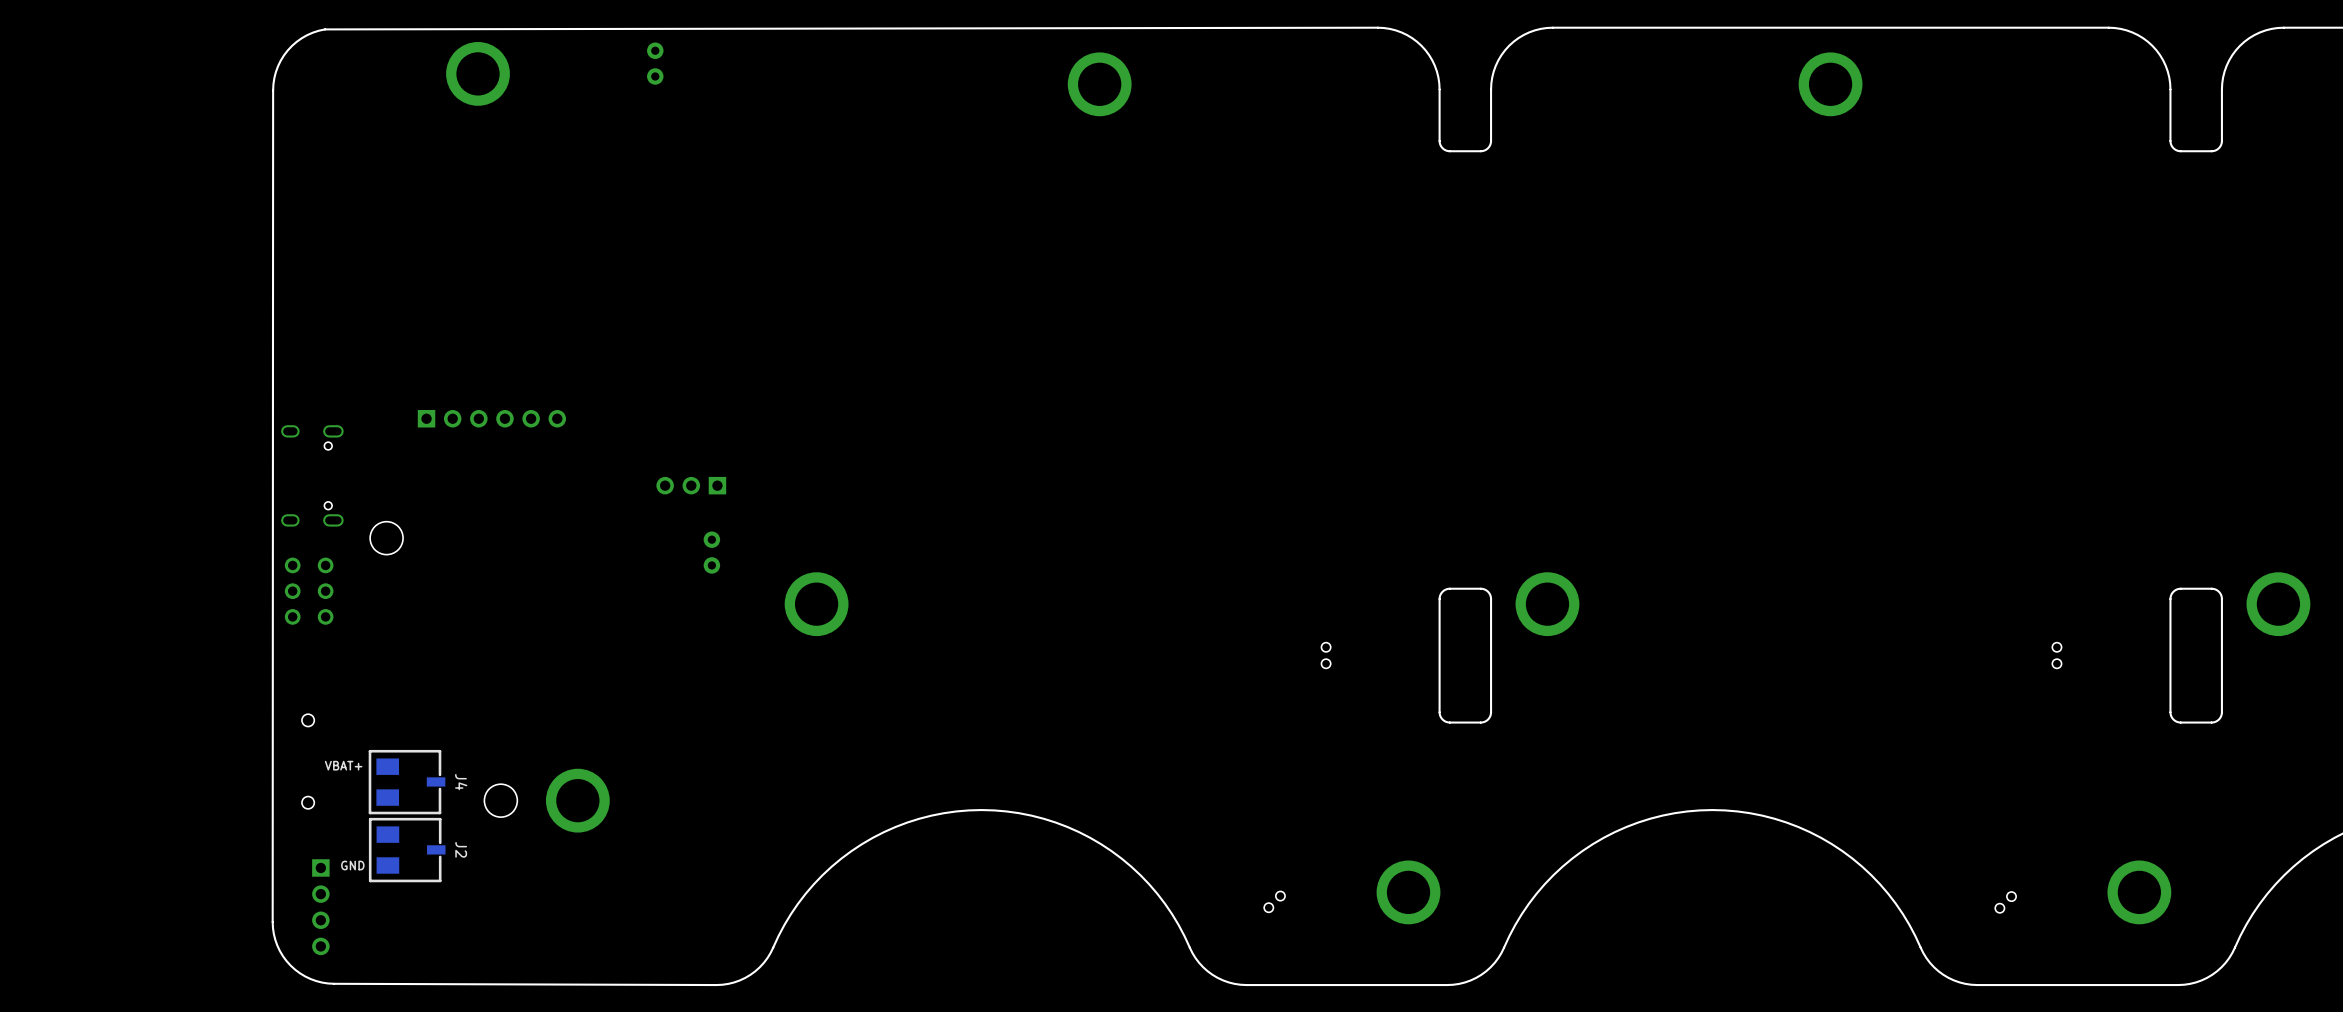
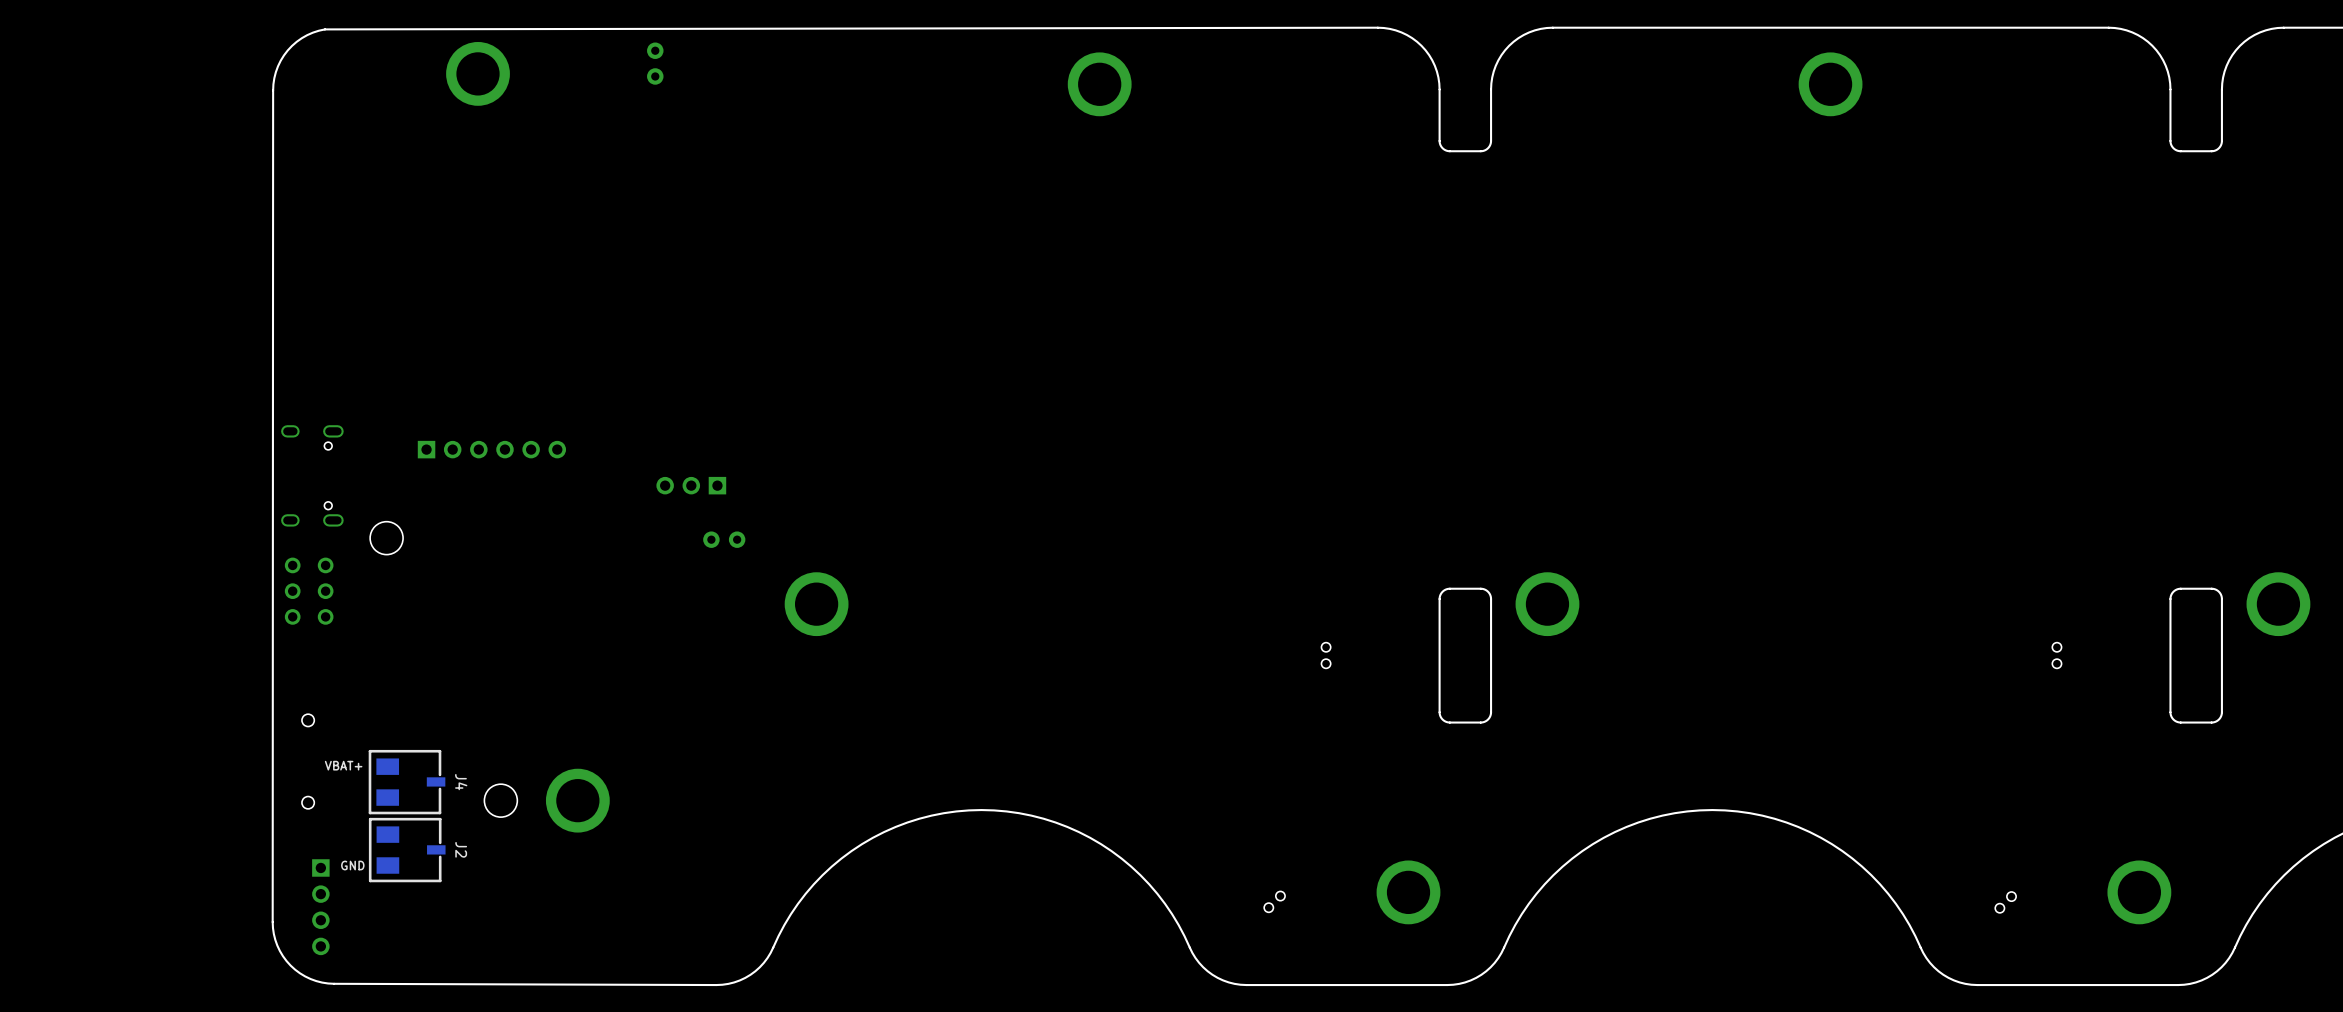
part position: (491, 418) -> (491, 449)
part rotation: 0° (711, 552) -> 90° clockwise (724, 539)

